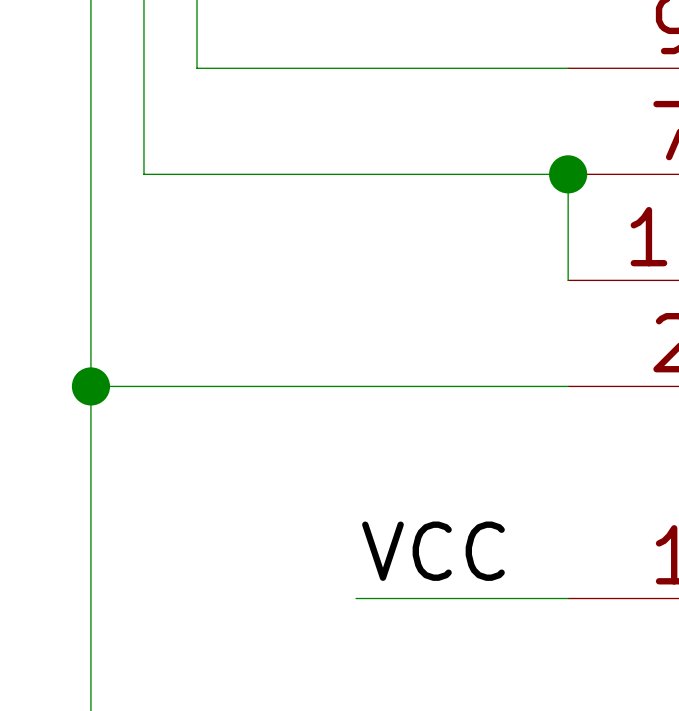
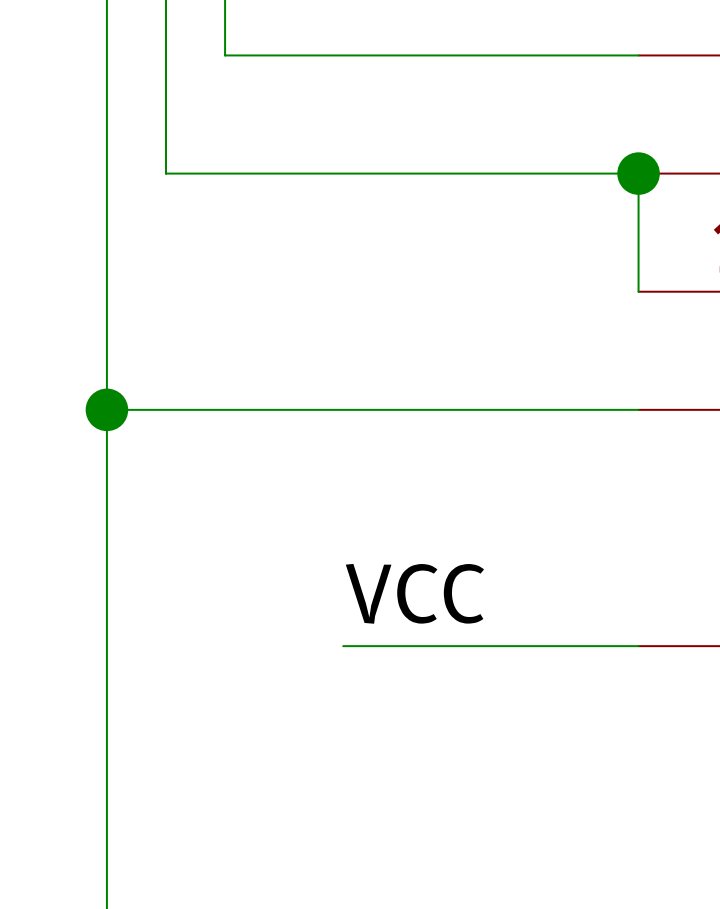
label position: VCC (433, 551) -> VCC (414, 593)
wire: none -> (343, 646) (402, 646)

